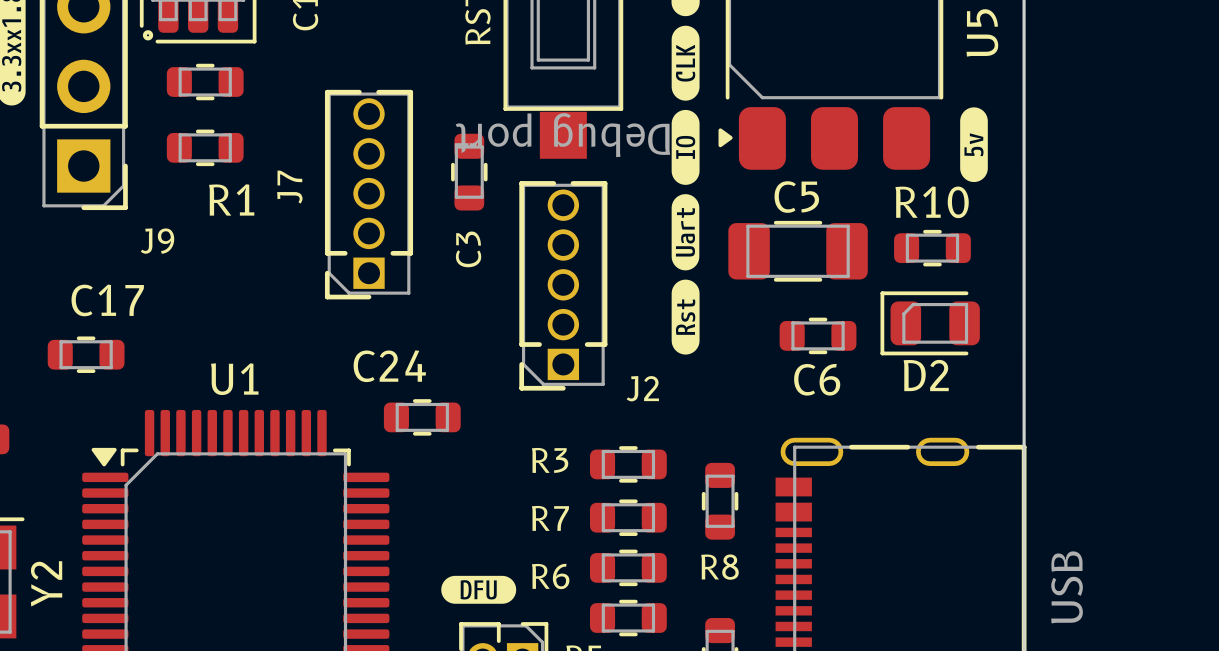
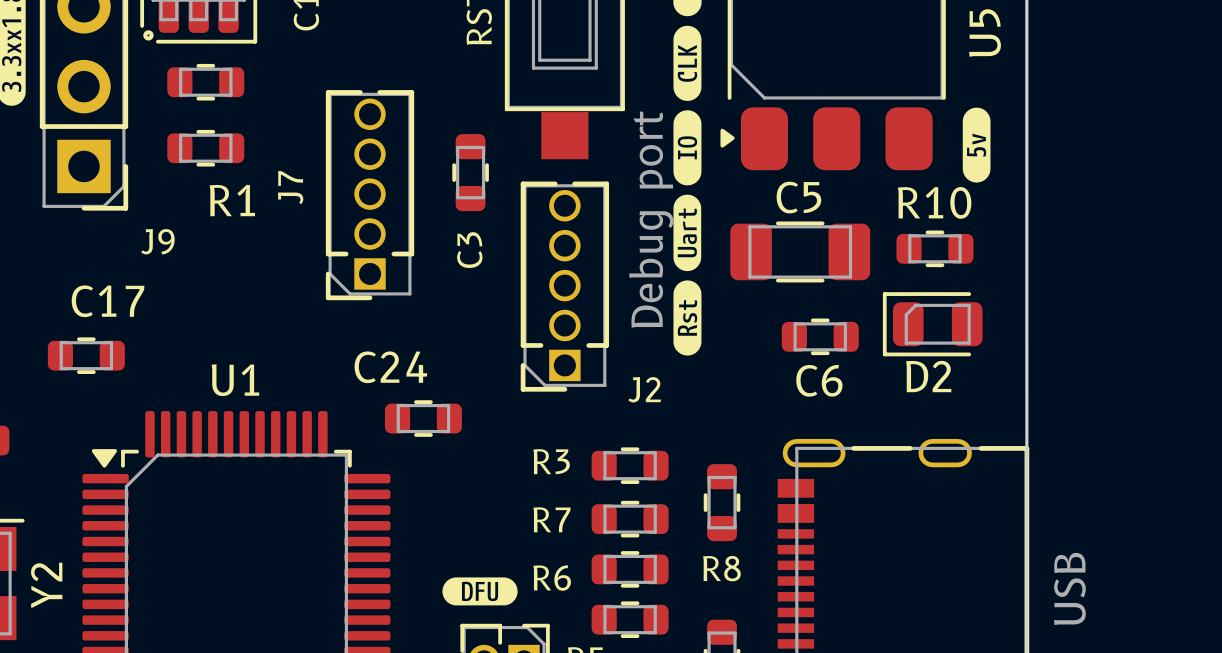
J2 value rotation: 0° (562, 135) -> 90° clockwise (651, 219)

